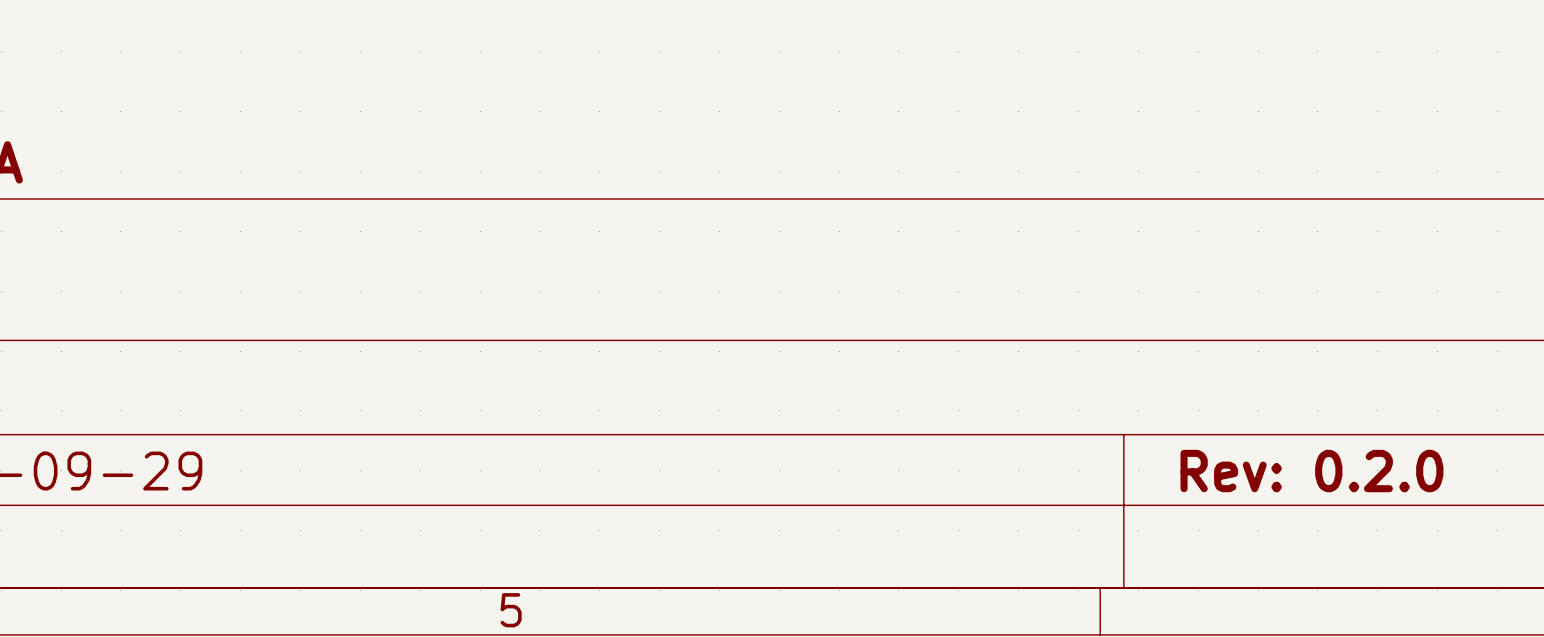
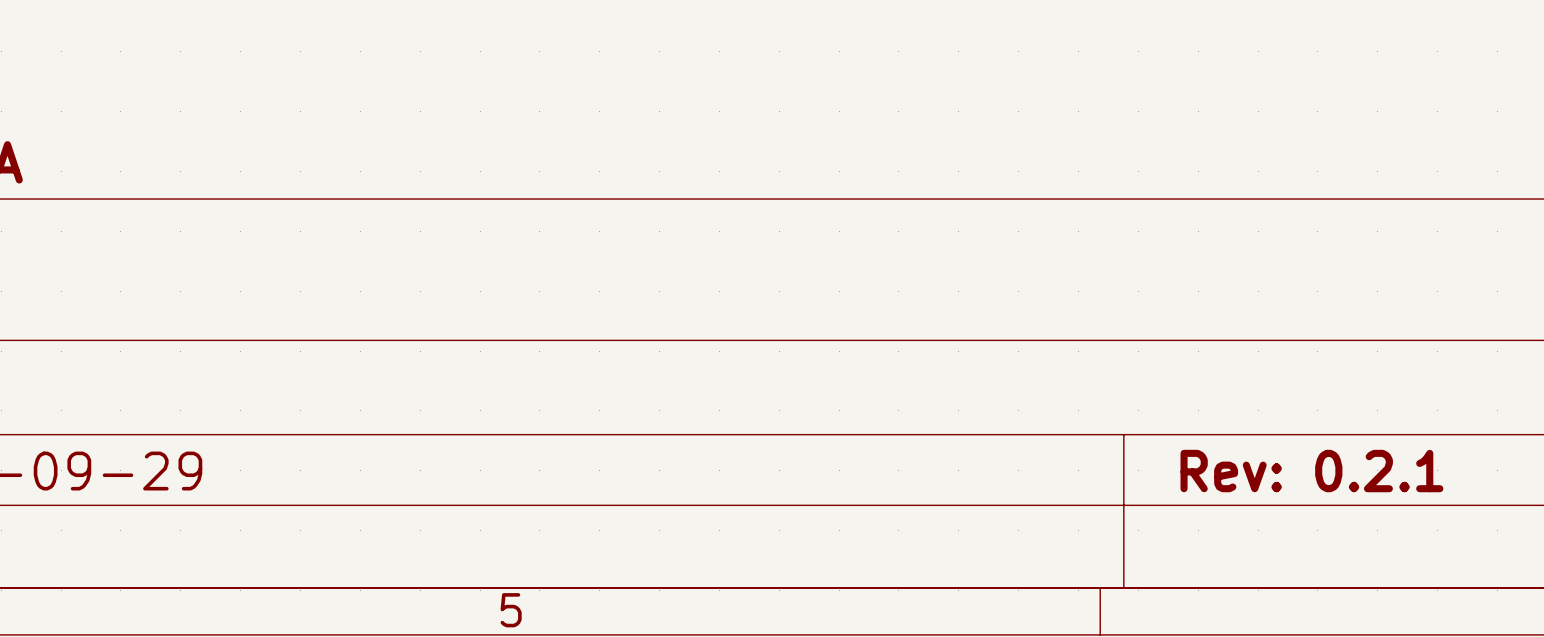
title block: Rev: 0.2.0 (1311, 471) -> Rev: 0.2.1 (1311, 471)

